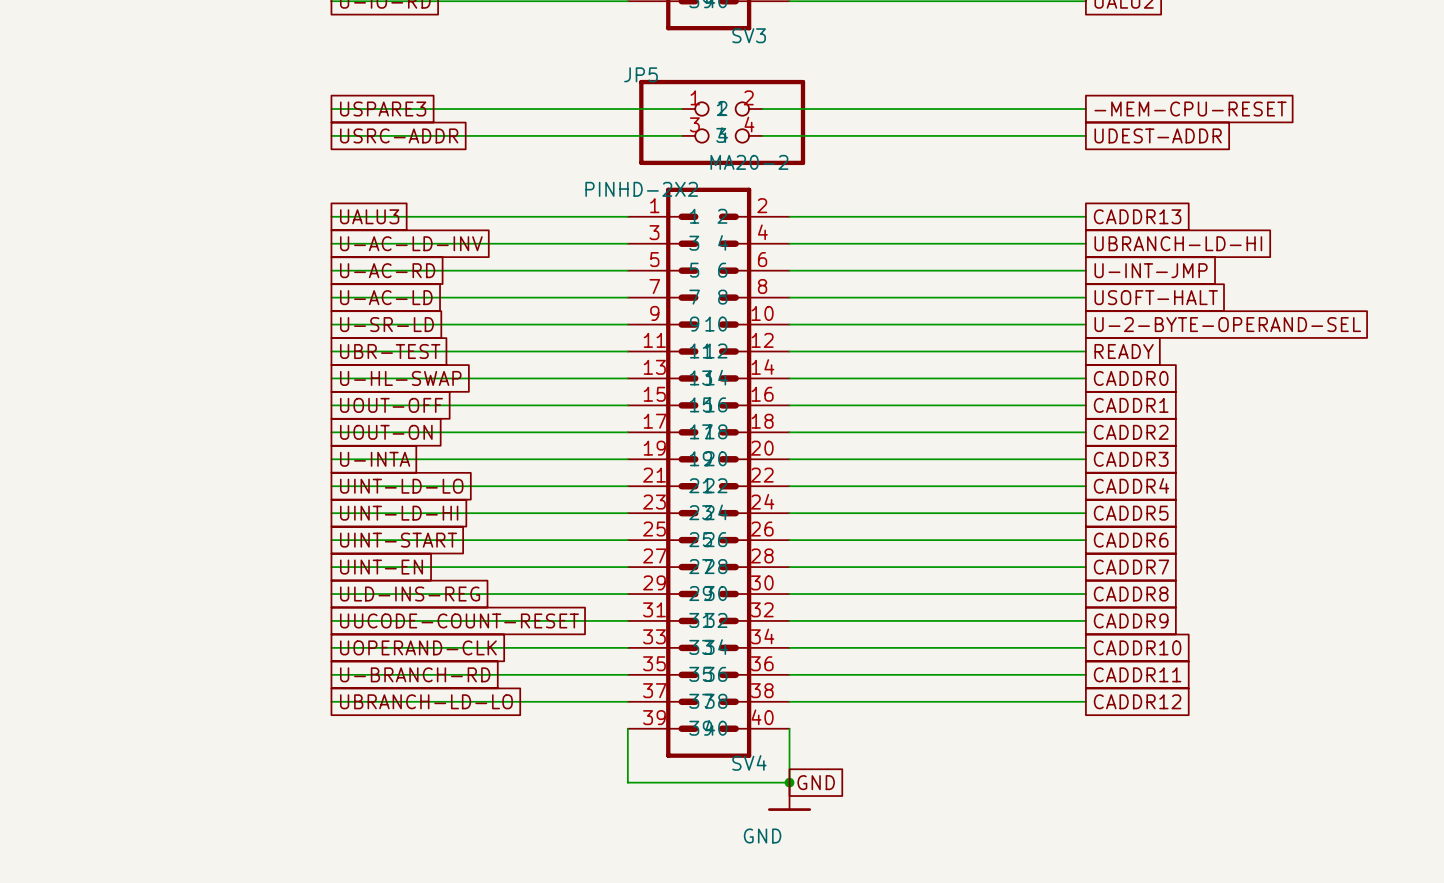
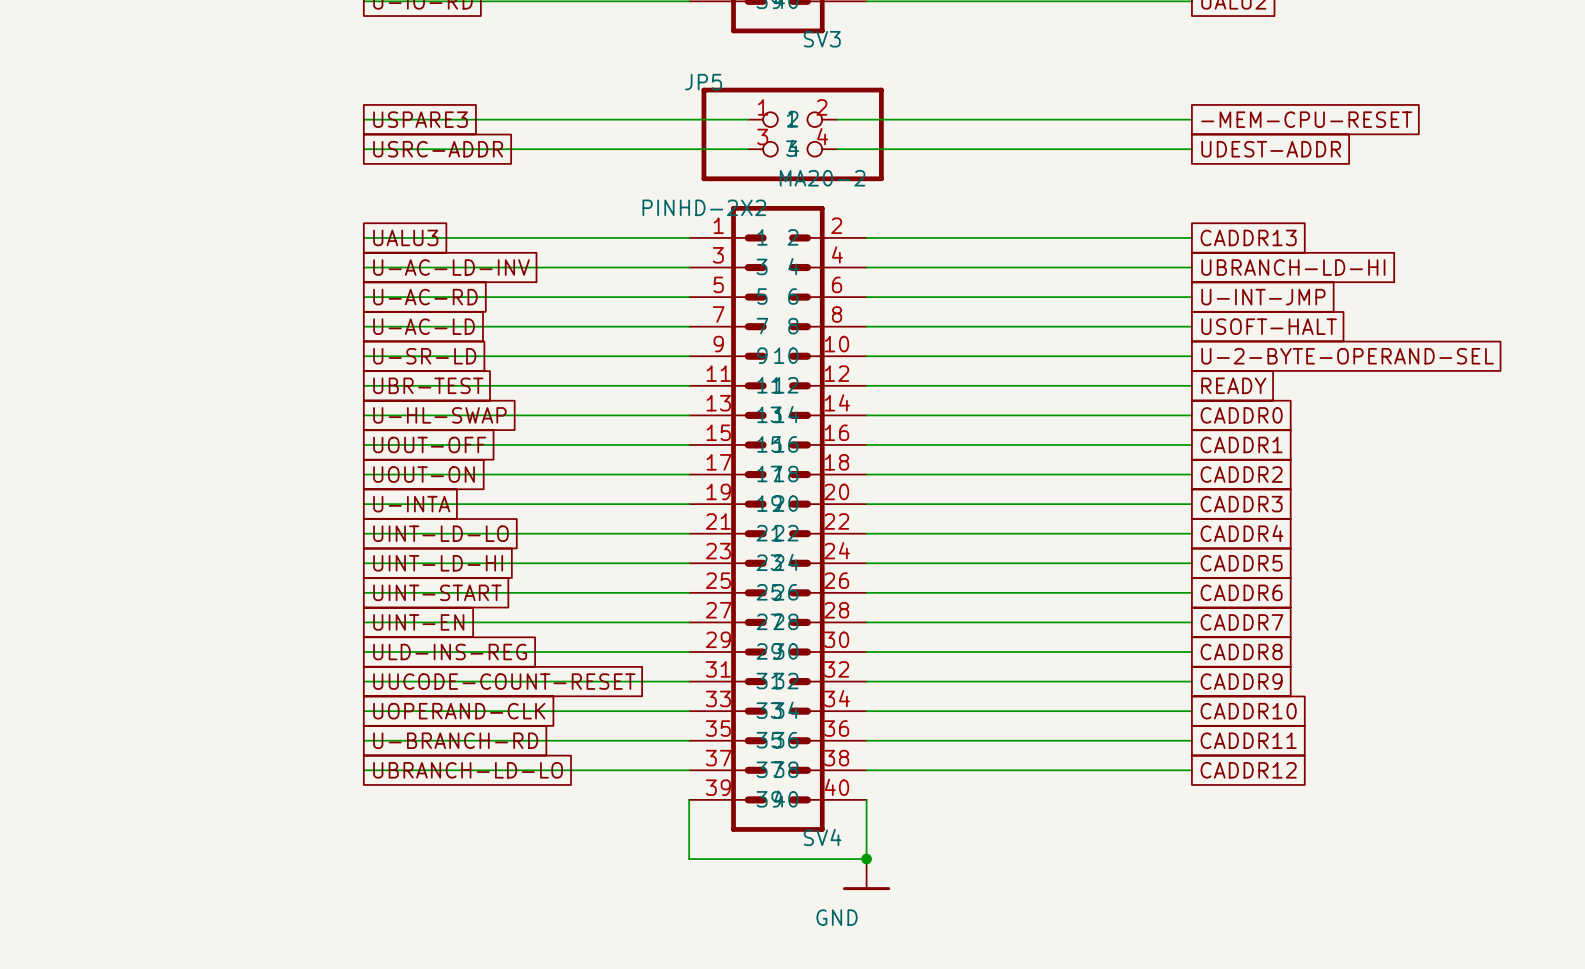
global label: GND (816, 782) -> none

